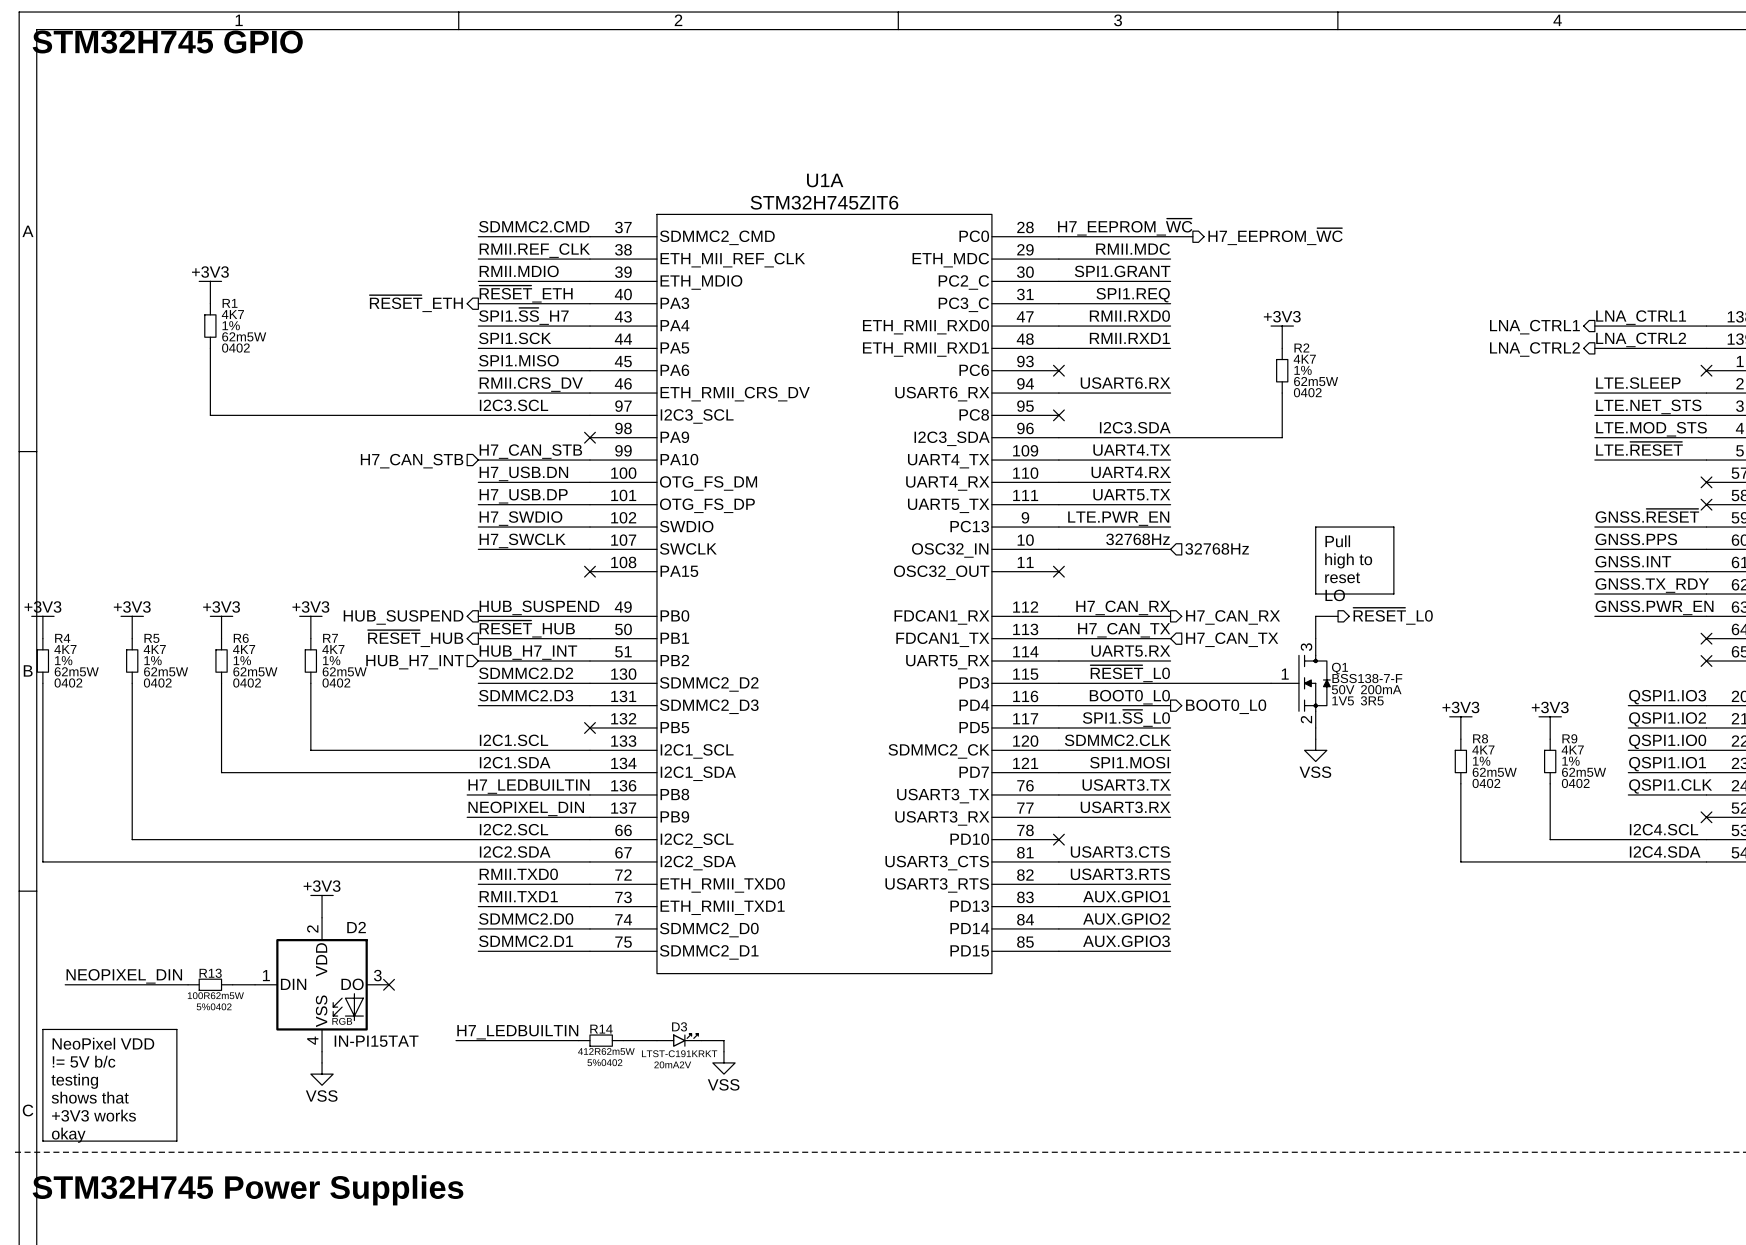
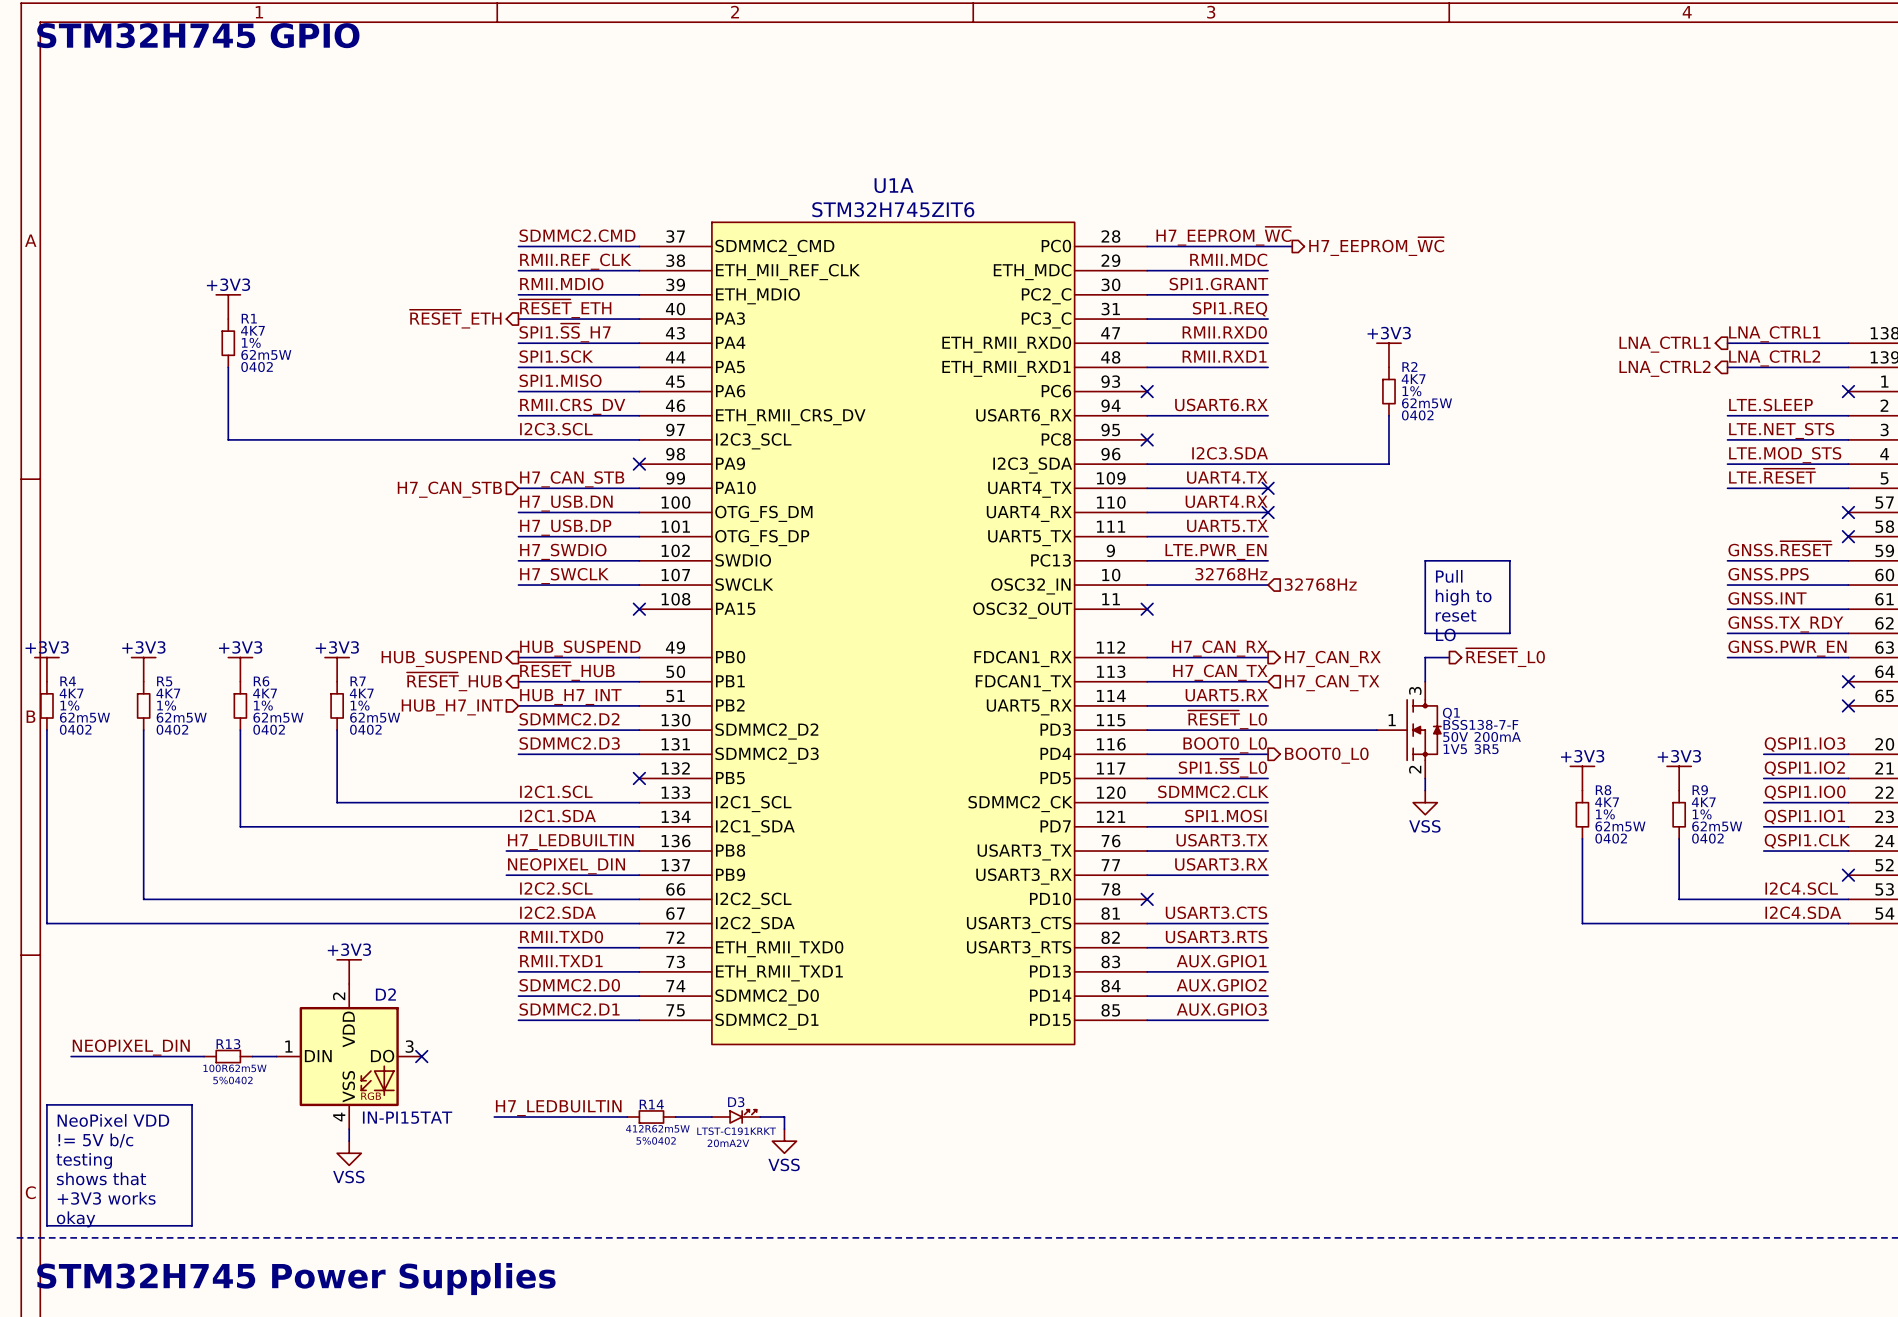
no-connect mark: none -> (1268, 488)
no-connect mark: none -> (1268, 512)

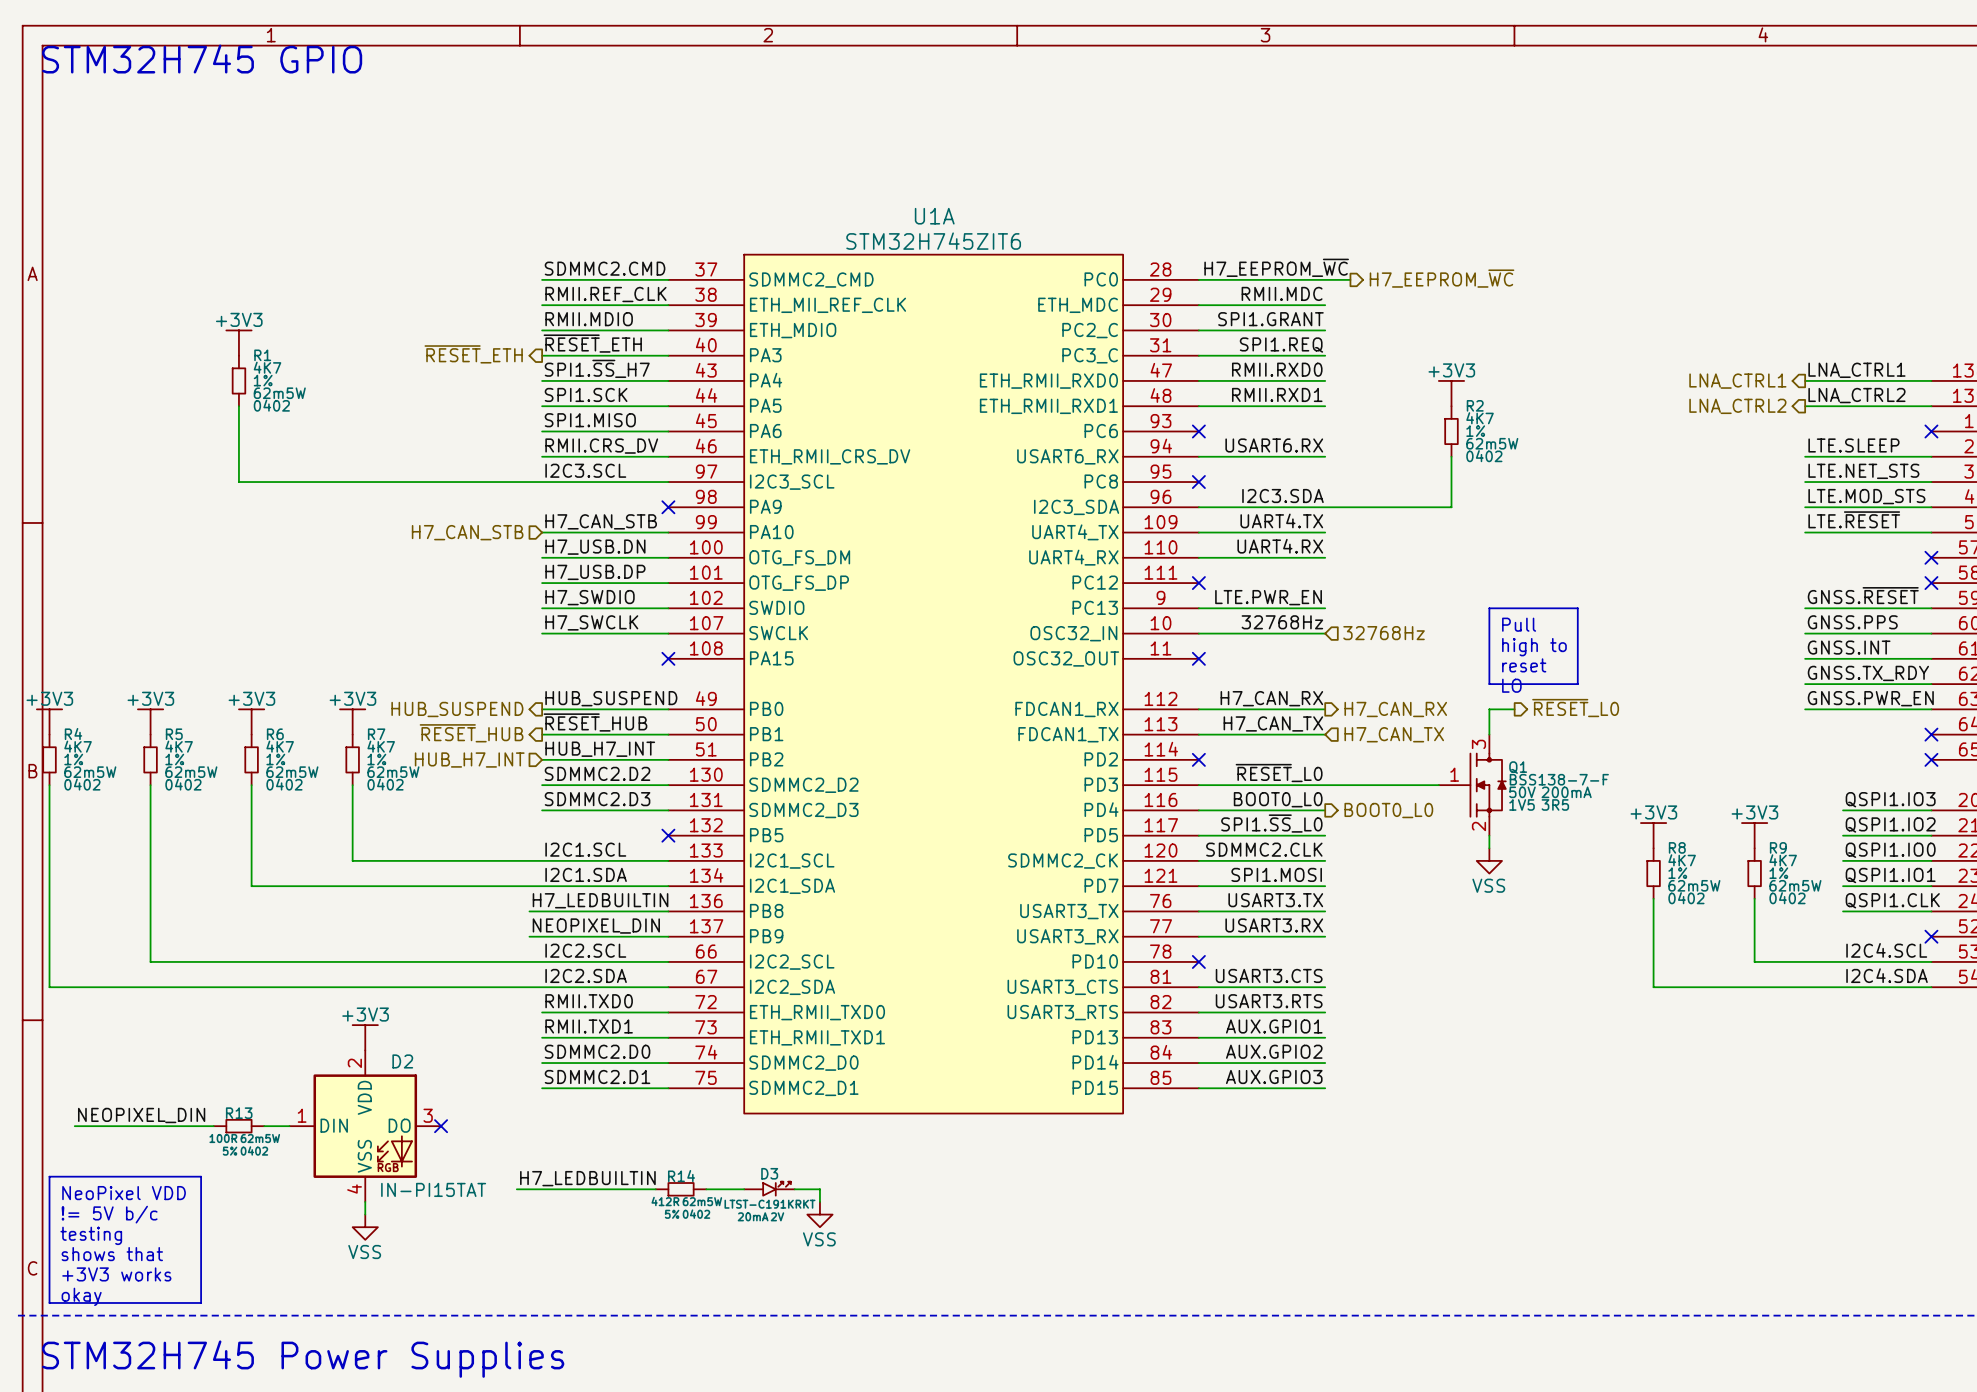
no-connect mark: (1268, 488) -> none
no-connect mark: (1268, 512) -> none
label: UART5.TX (1227, 525) -> none
wire: (1147, 536) (1268, 536) -> none
no-connect mark: none -> (1198, 583)
U1A pin name: UART5_TX (1029, 538) -> PC12 (1095, 582)
label: UART5.RX (1226, 695) -> none
wire: (1147, 705) (1268, 705) -> none
no-connect mark: none -> (1198, 759)
U1A pin name: UART5_RX (1029, 707) -> PD2 (1101, 759)

